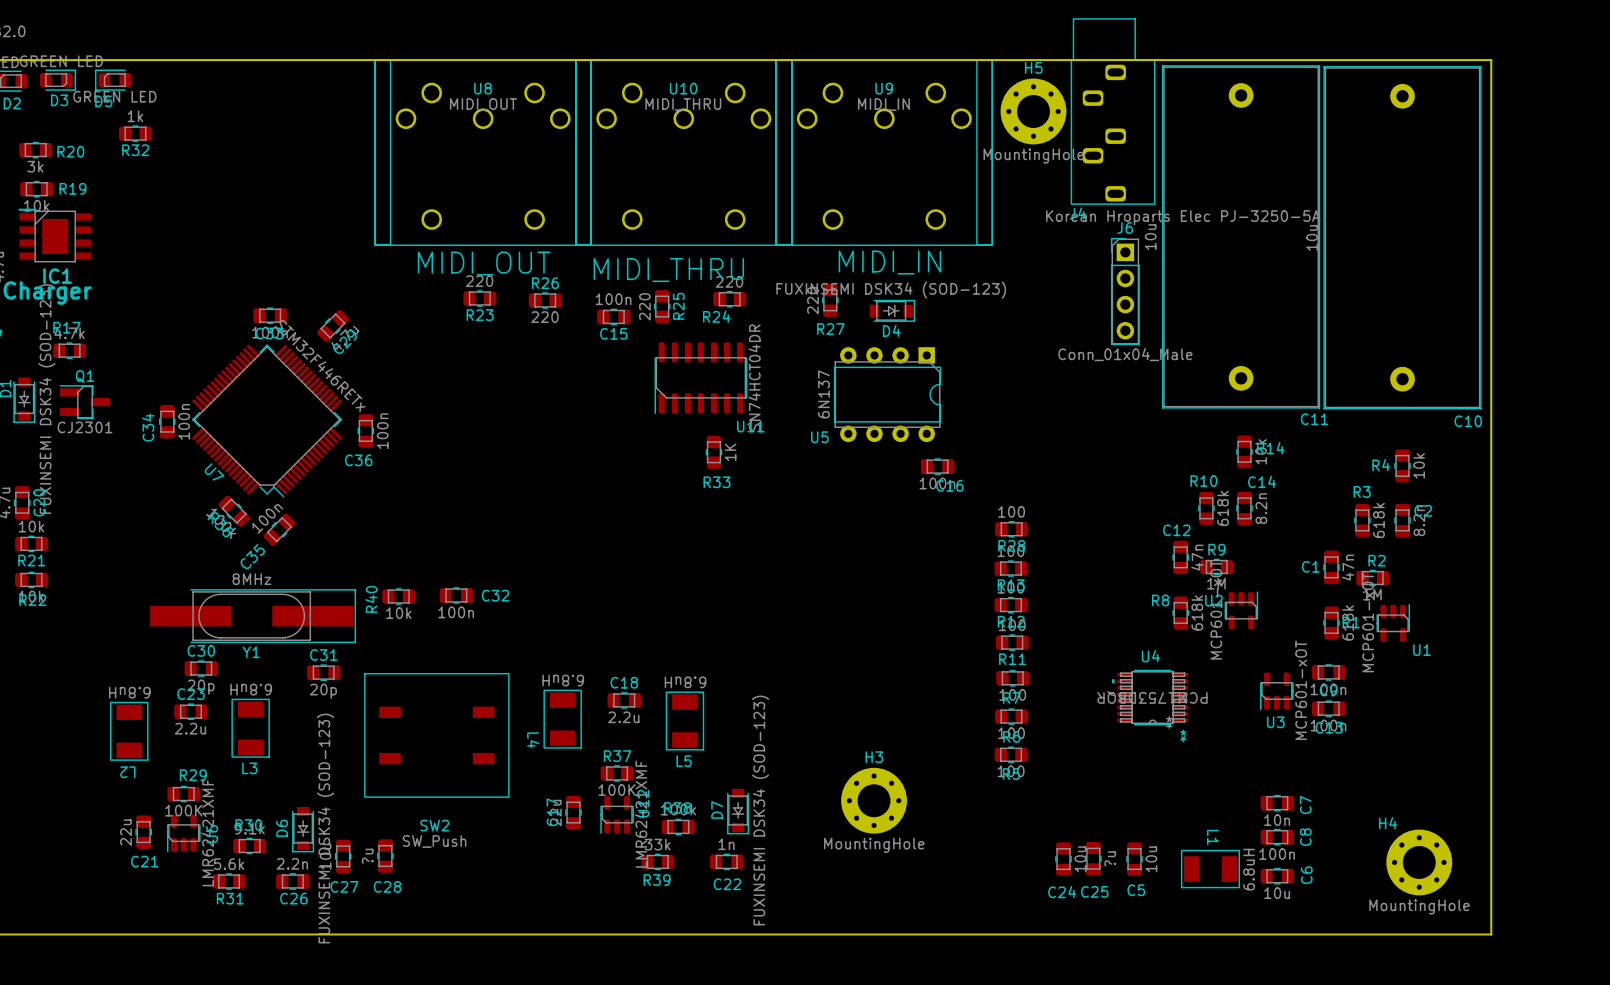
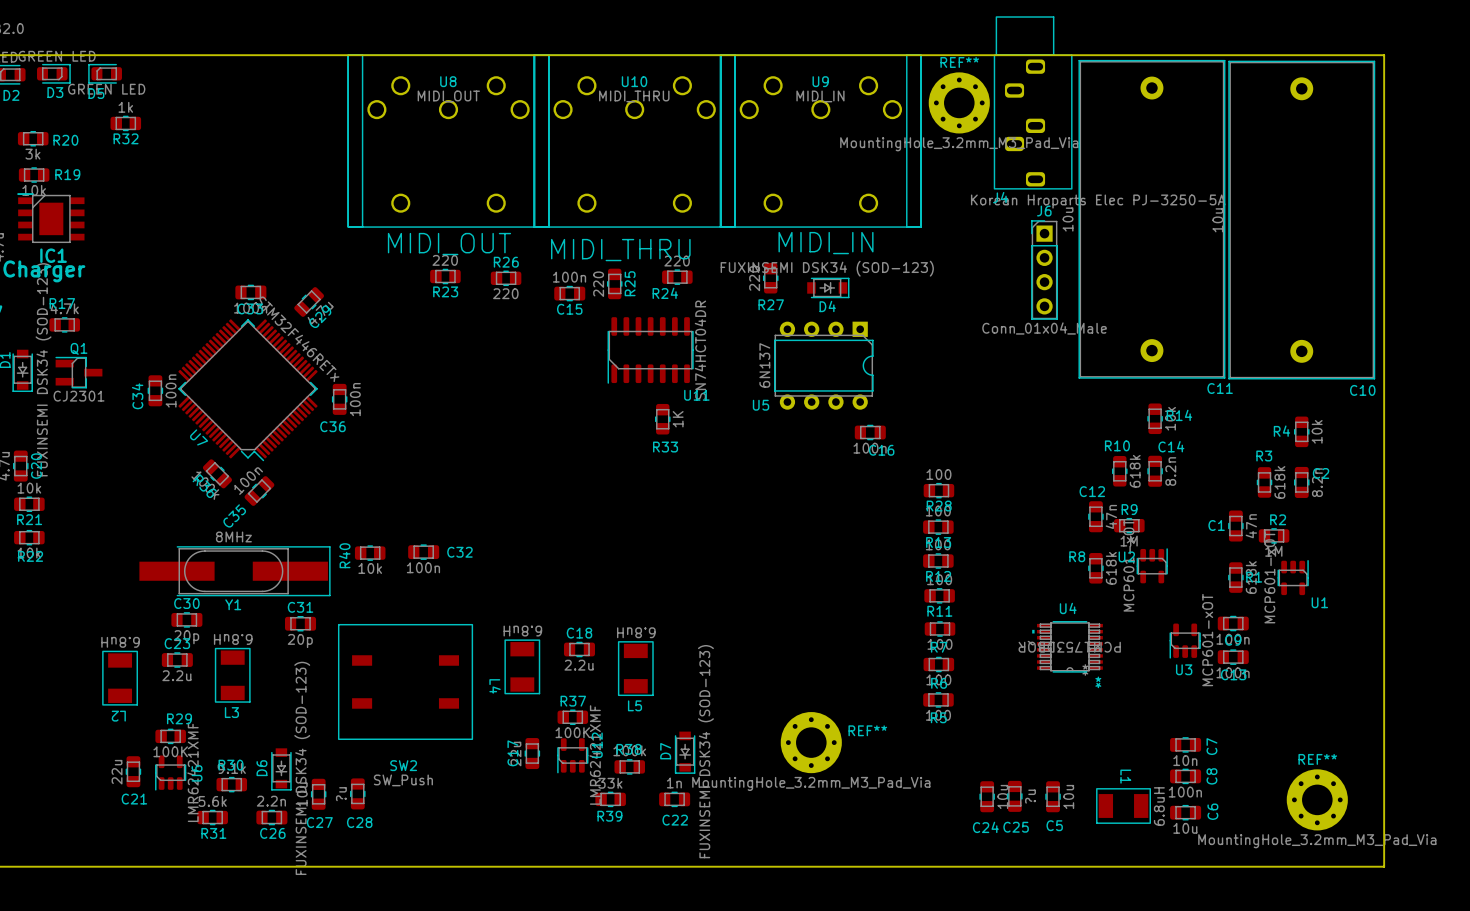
H5 name: H5 (1033, 67) -> REF** (959, 62)
H5 value: MountingHole (1033, 156) -> MountingHole_3.2mm_M3_Pad_Via (959, 144)
H3 name: H3 (874, 757) -> REF** (867, 730)
H4 name: H4 (1388, 823) -> REF** (1317, 759)
H3 value: MountingHole (874, 845) -> MountingHole_3.2mm_M3_Pad_Via (811, 783)
H4 value: MountingHole (1419, 907) -> MountingHole_3.2mm_M3_Pad_Via (1317, 841)

